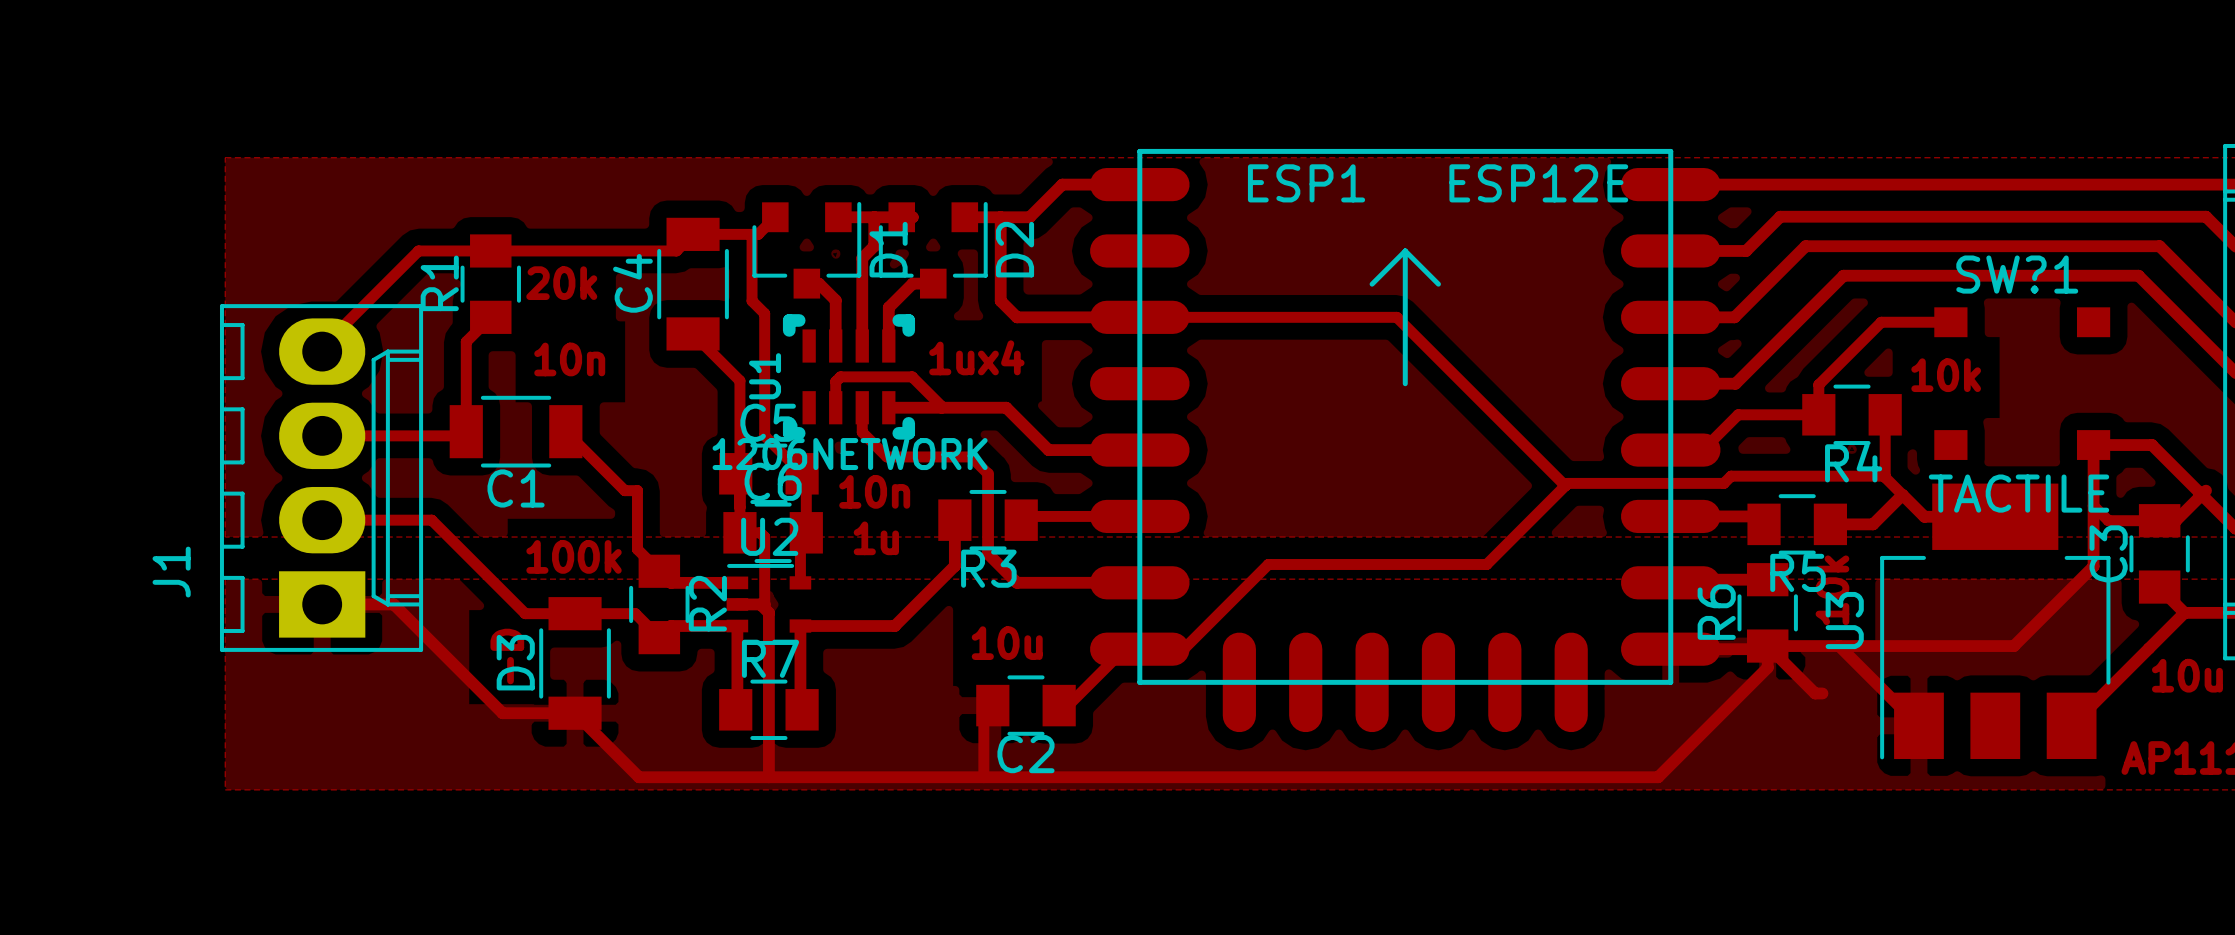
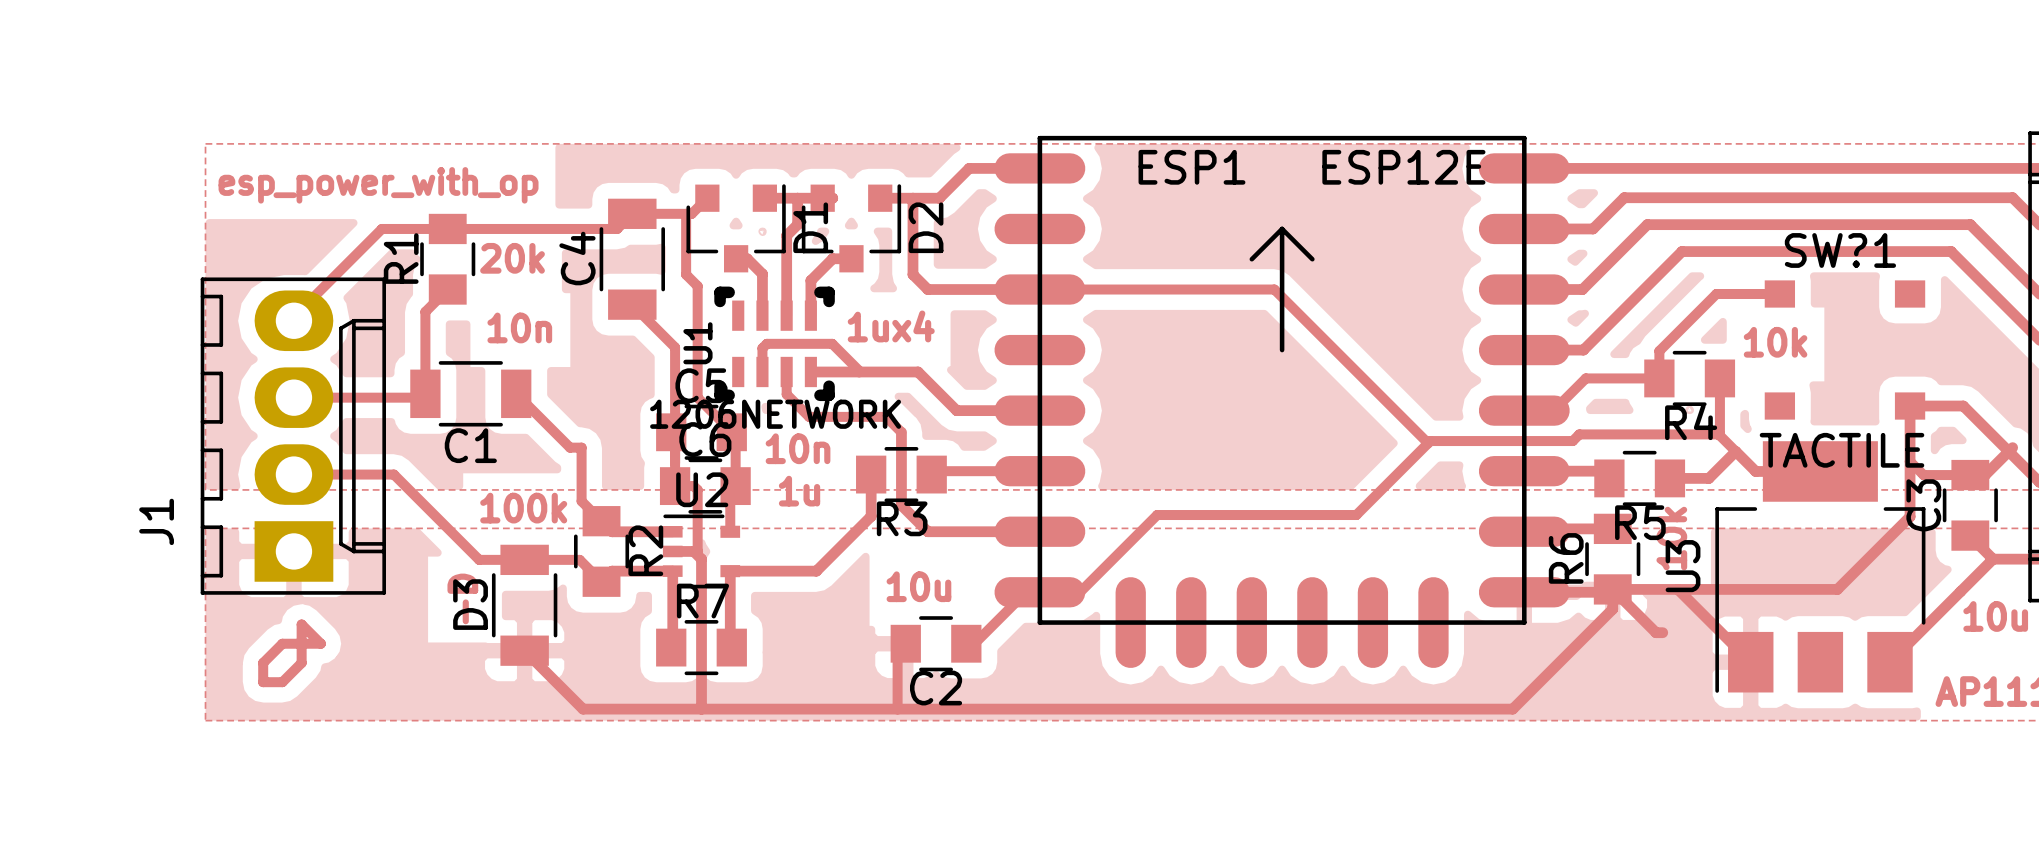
text: none -> esp_power_with_op (378, 185)
top track: (322, 604) (393, 604) (502, 713) (575, 713) -> none
top track: none -> (301, 624) (301, 662) (282, 682) (263, 682) (263, 662) (282, 643) (320, 643) (301, 624)

